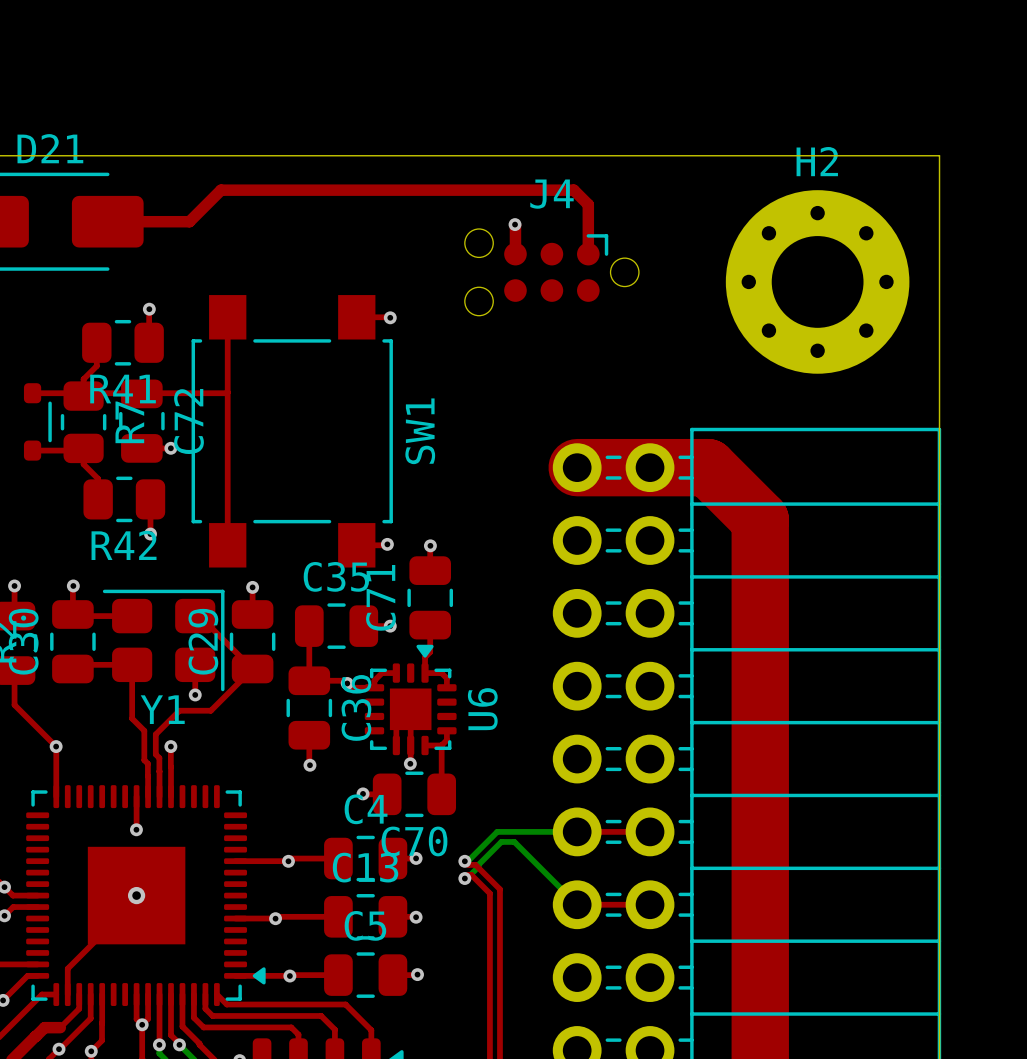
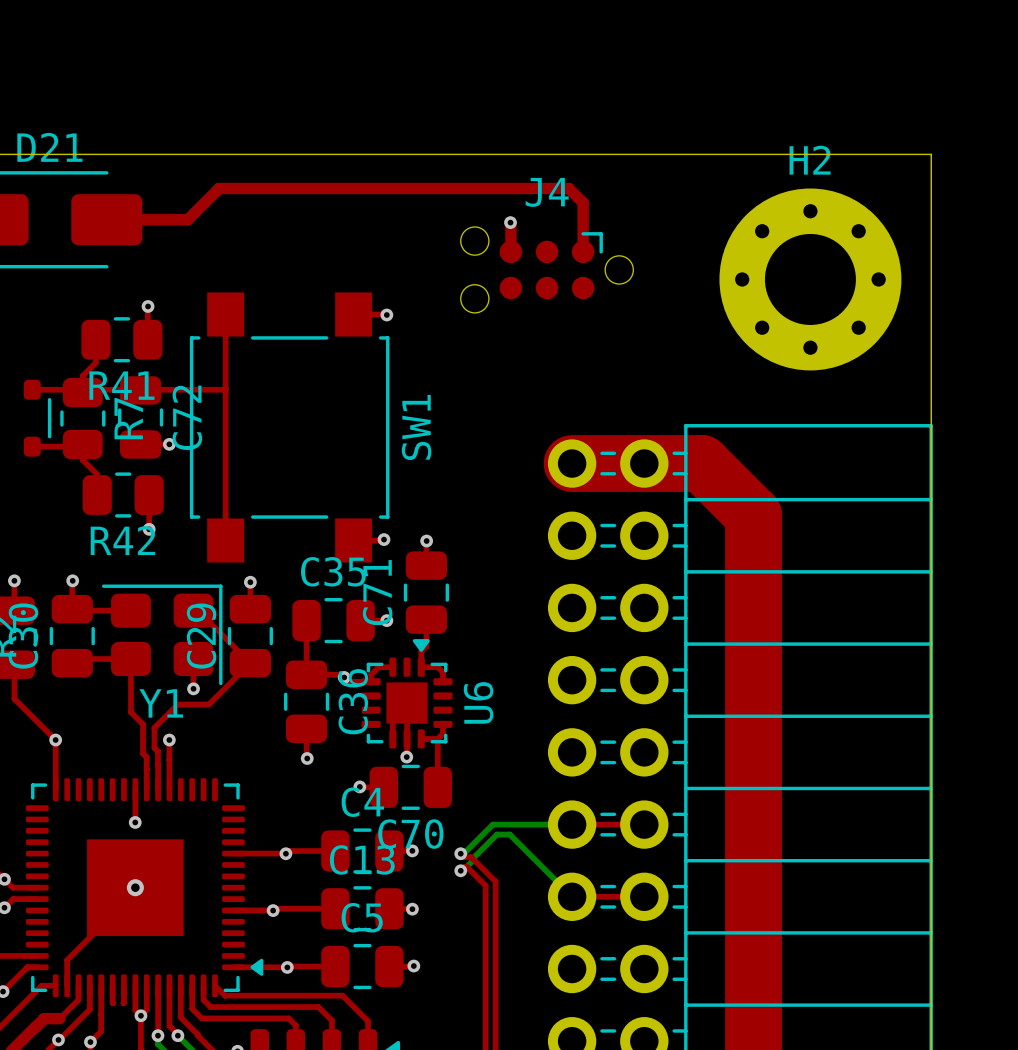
top track: none -> (112, 985) (113, 1003)
top track: none -> (124, 985) (123, 1003)

